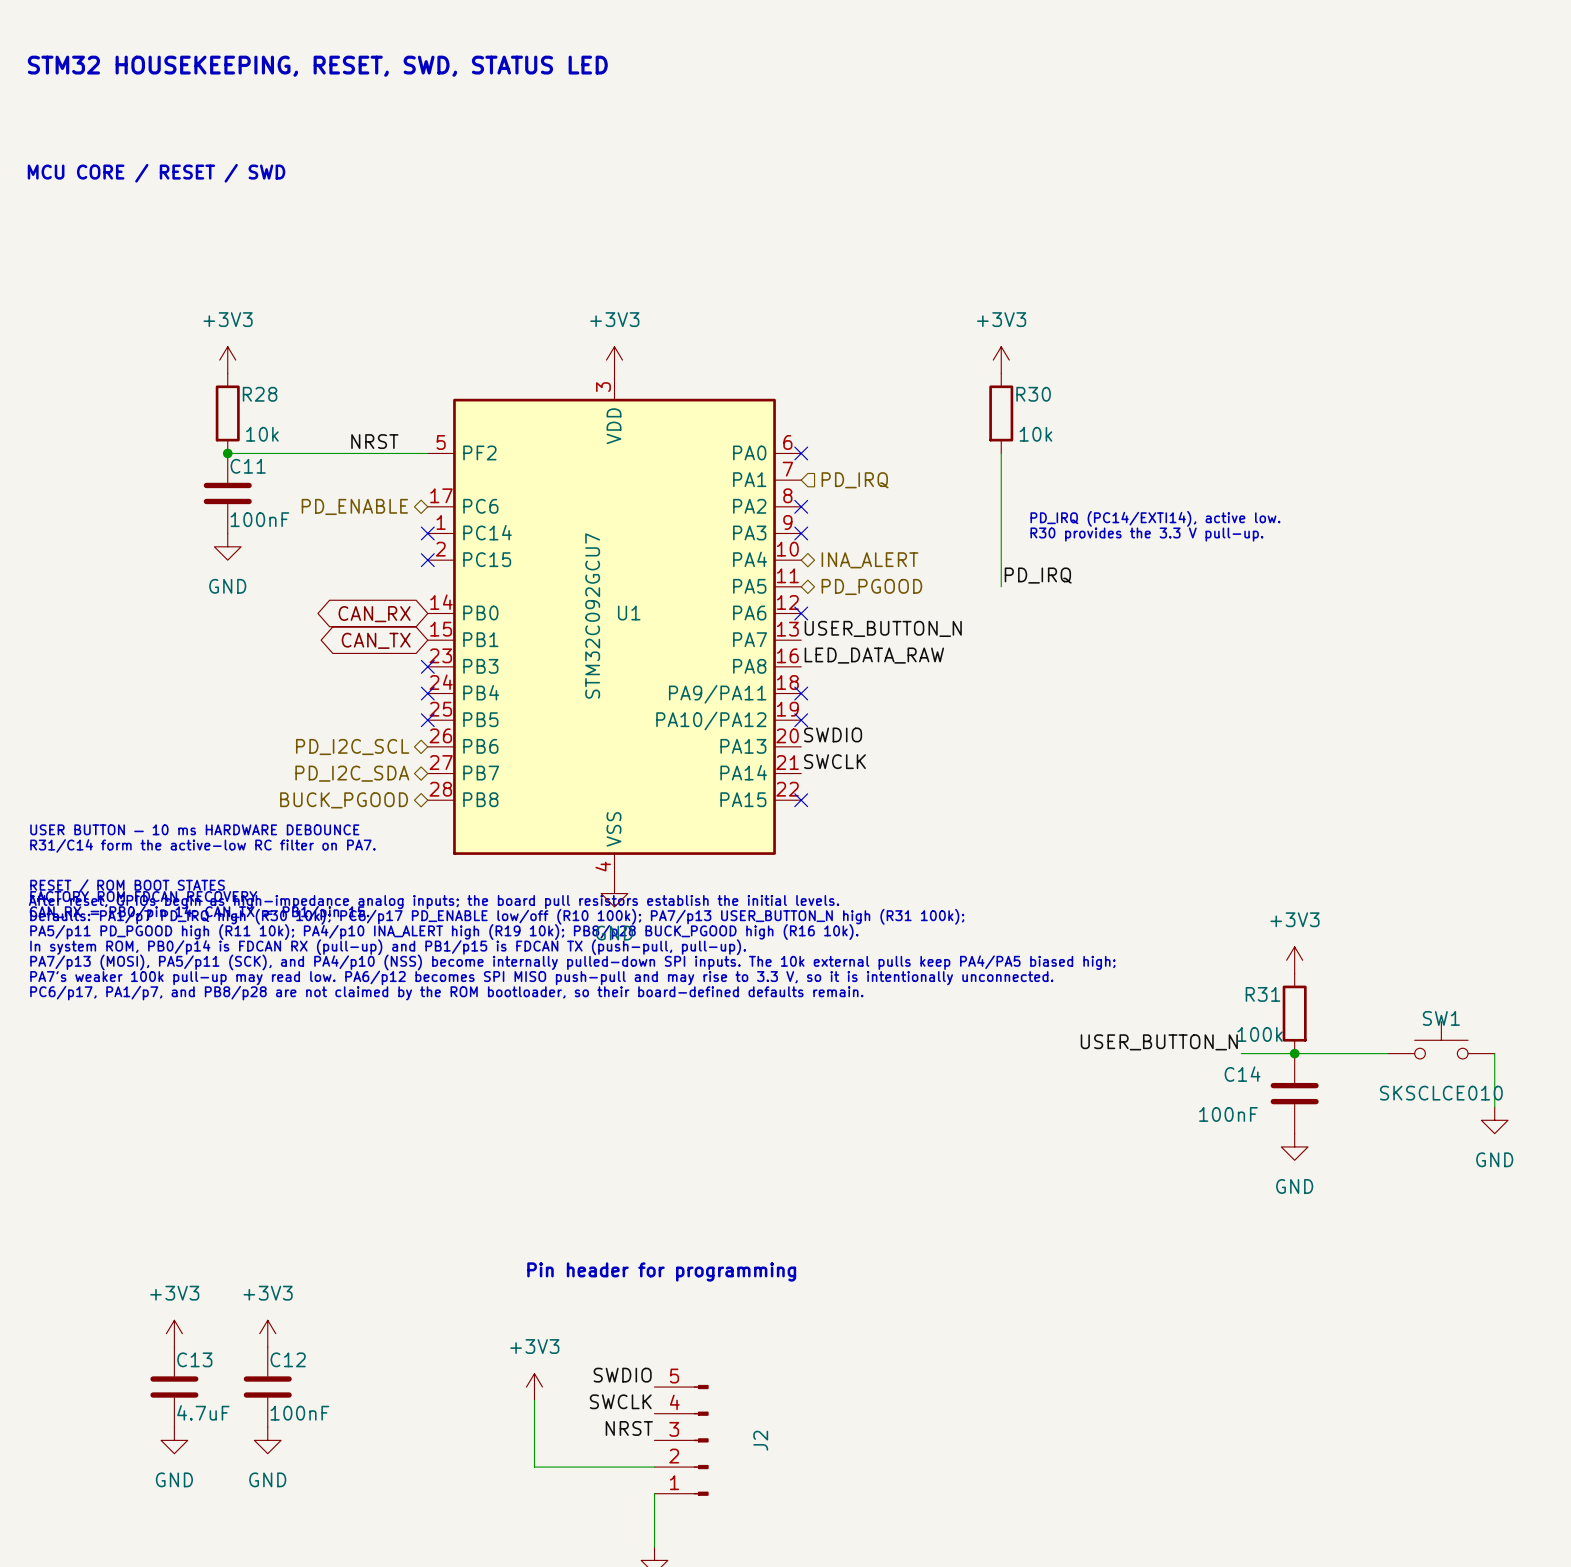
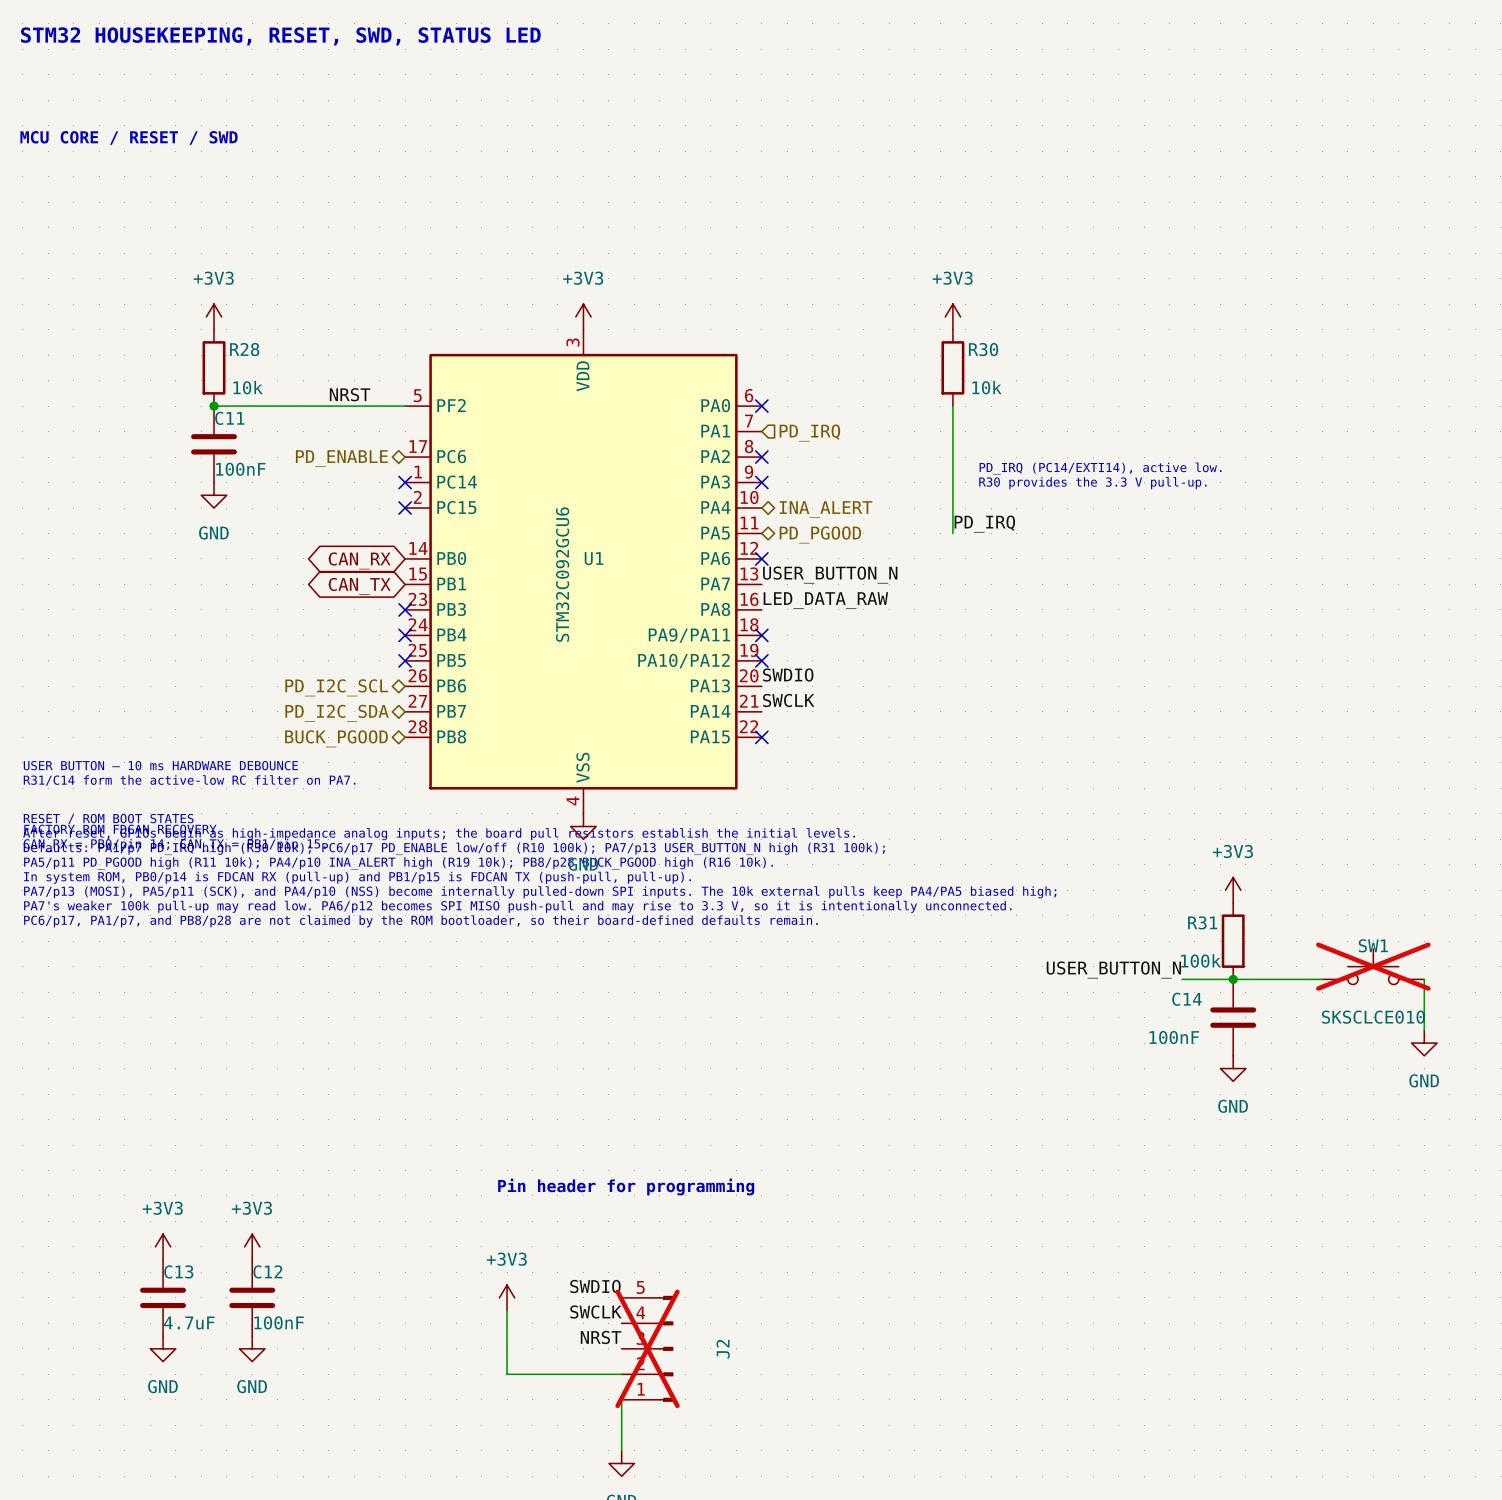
U1 value: STM32C092GCU7 (592, 616) -> STM32C092GCU6 (562, 574)
SW1 do-not-place cross: none -> (1373, 966)
J2 do-not-place cross: none -> (647, 1348)

